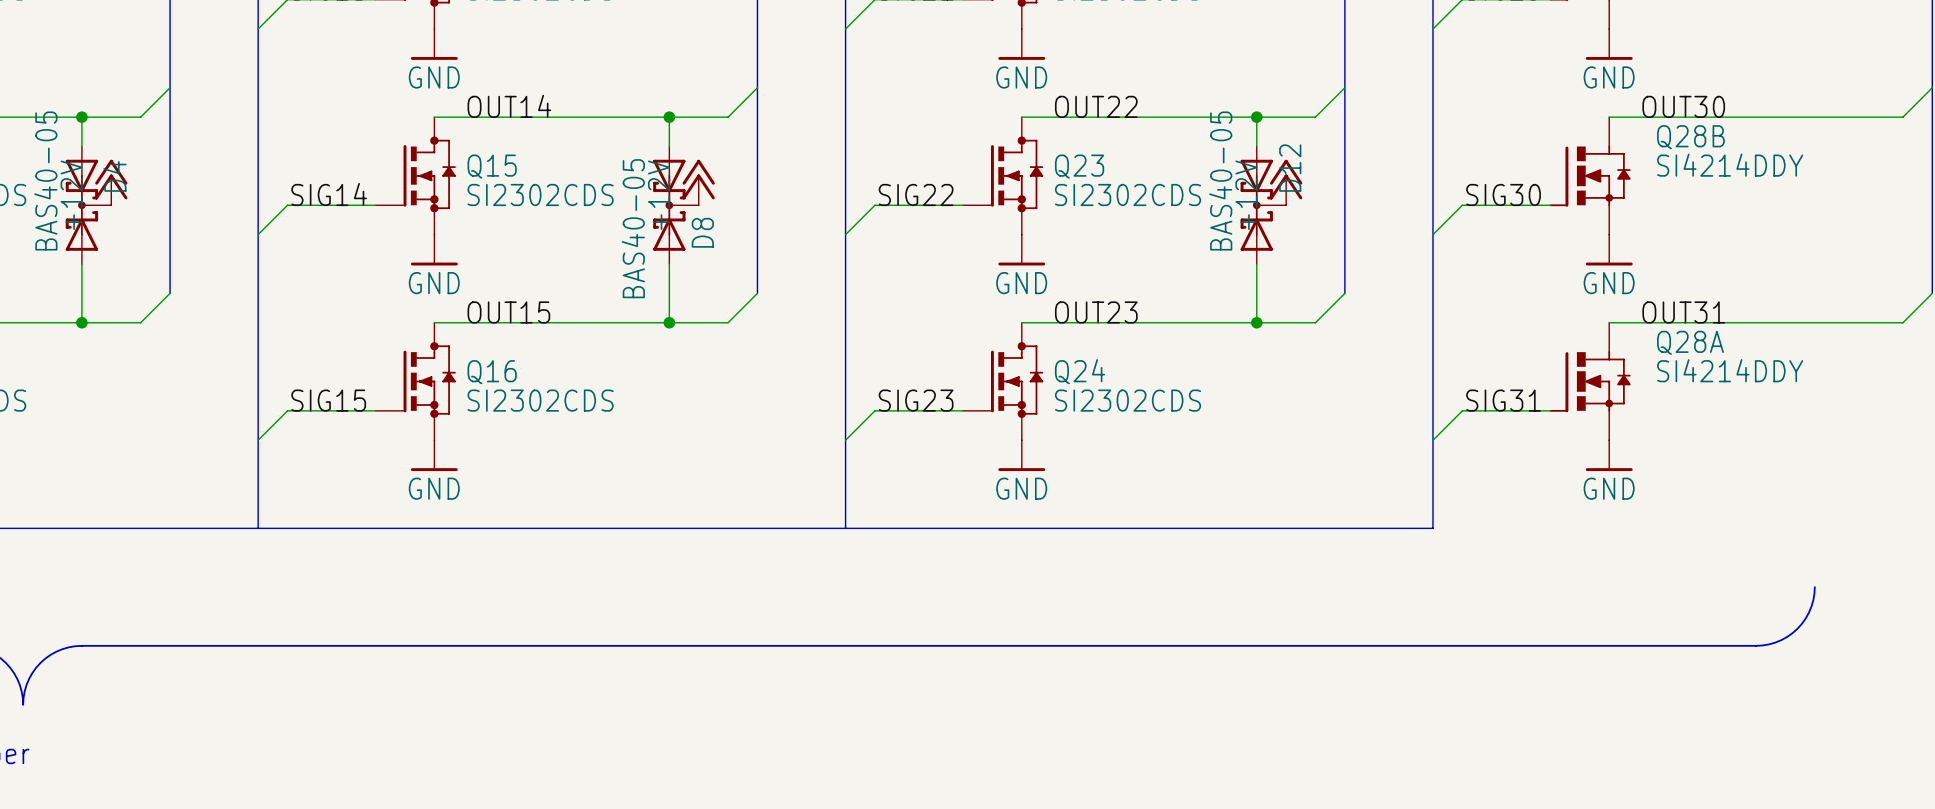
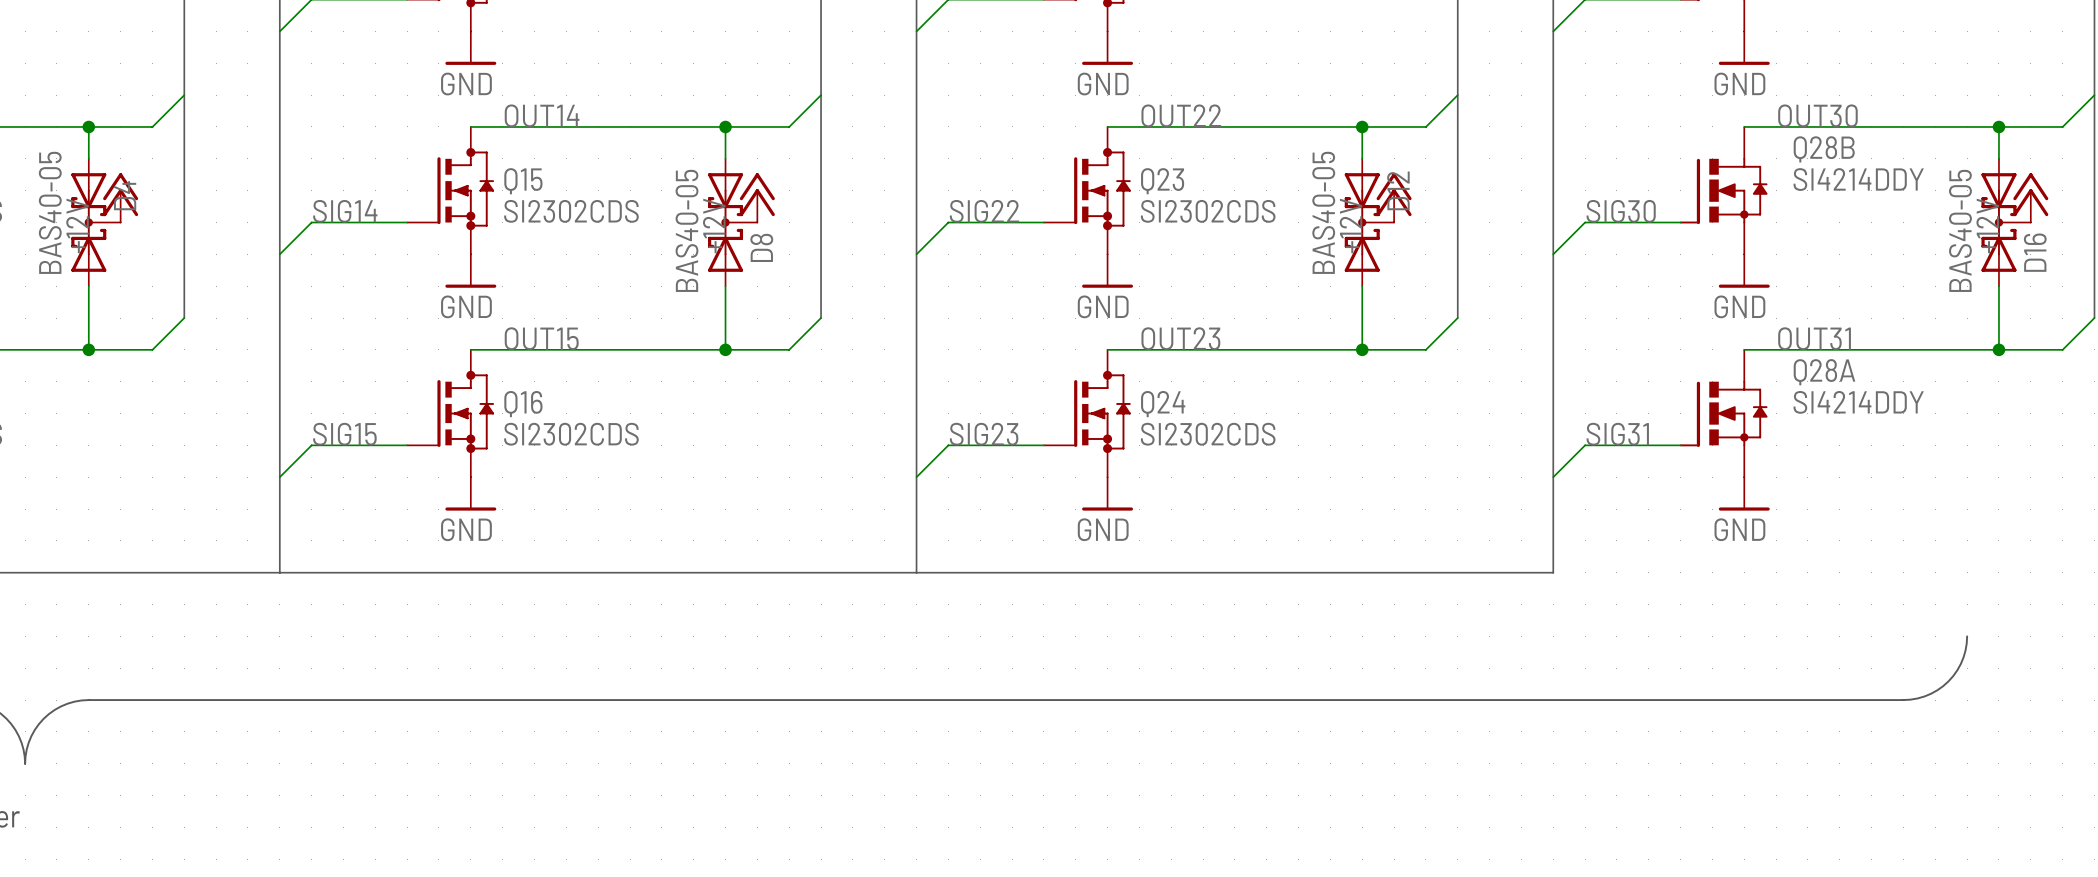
wire: none -> (1998, 126) (1998, 158)
junction: none -> (1998, 126)
power symbol: none -> +12V (2030, 197)
D16: none -> BAS40-05 (2006, 222)
wire: none -> (1998, 286) (1998, 349)
junction: none -> (1998, 349)

